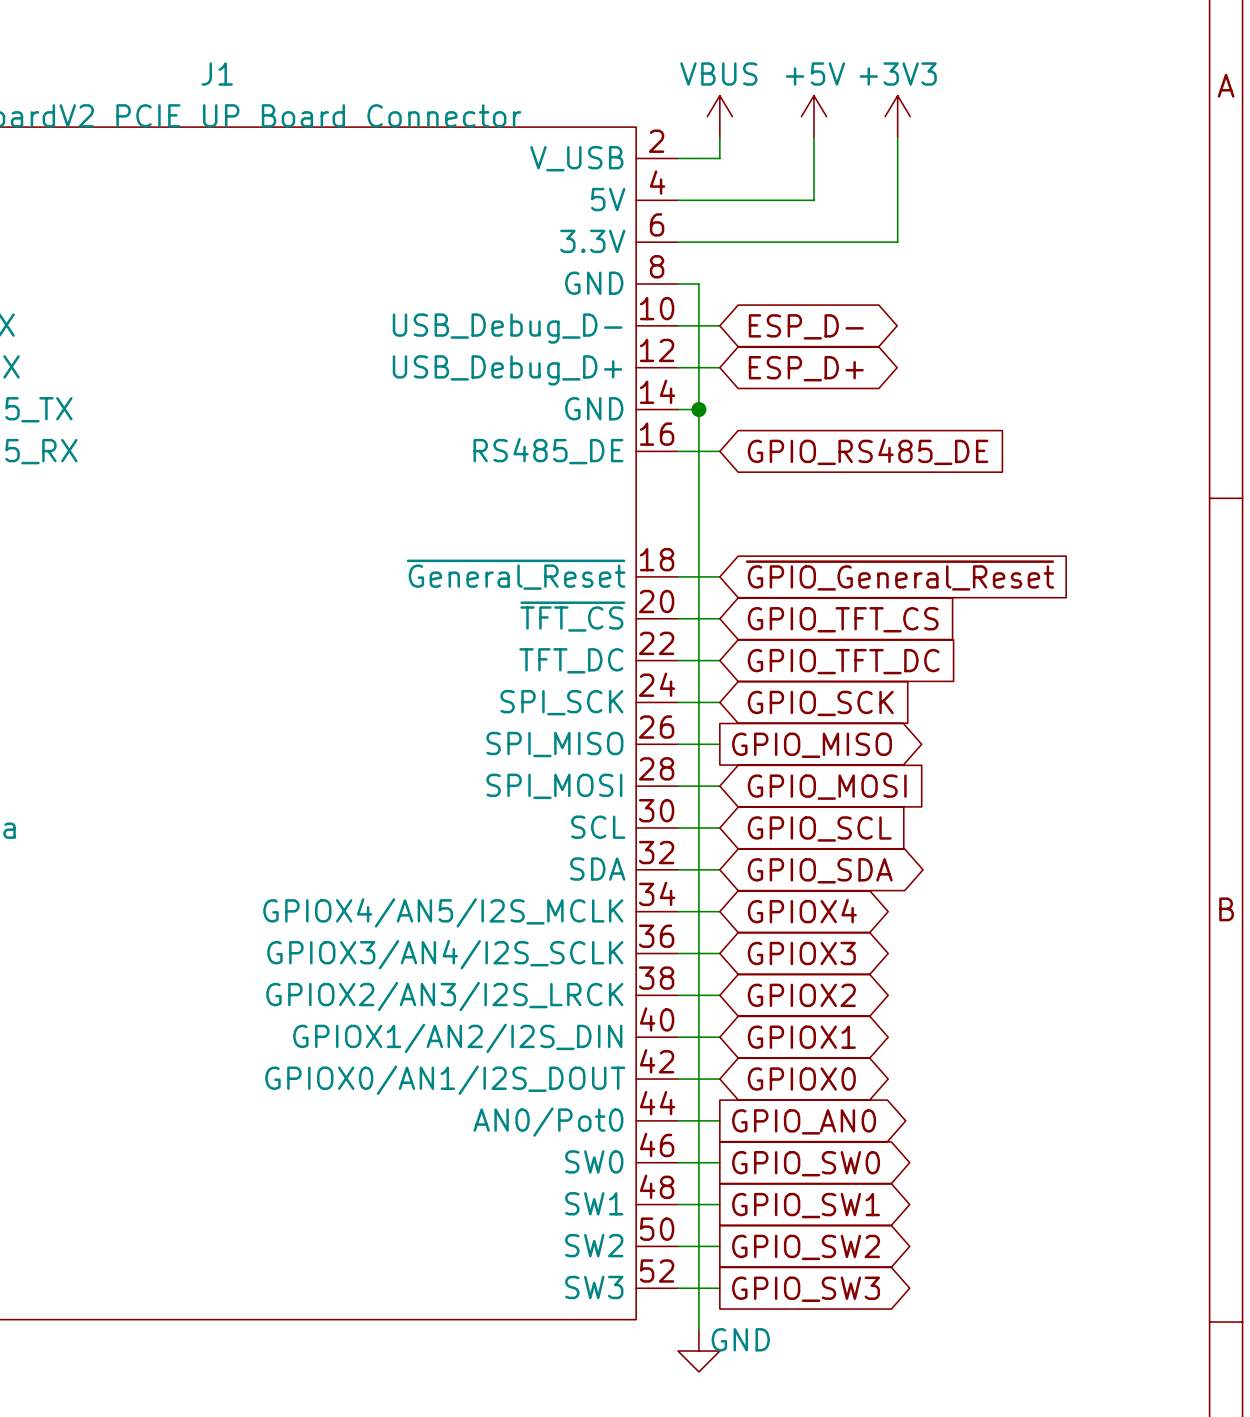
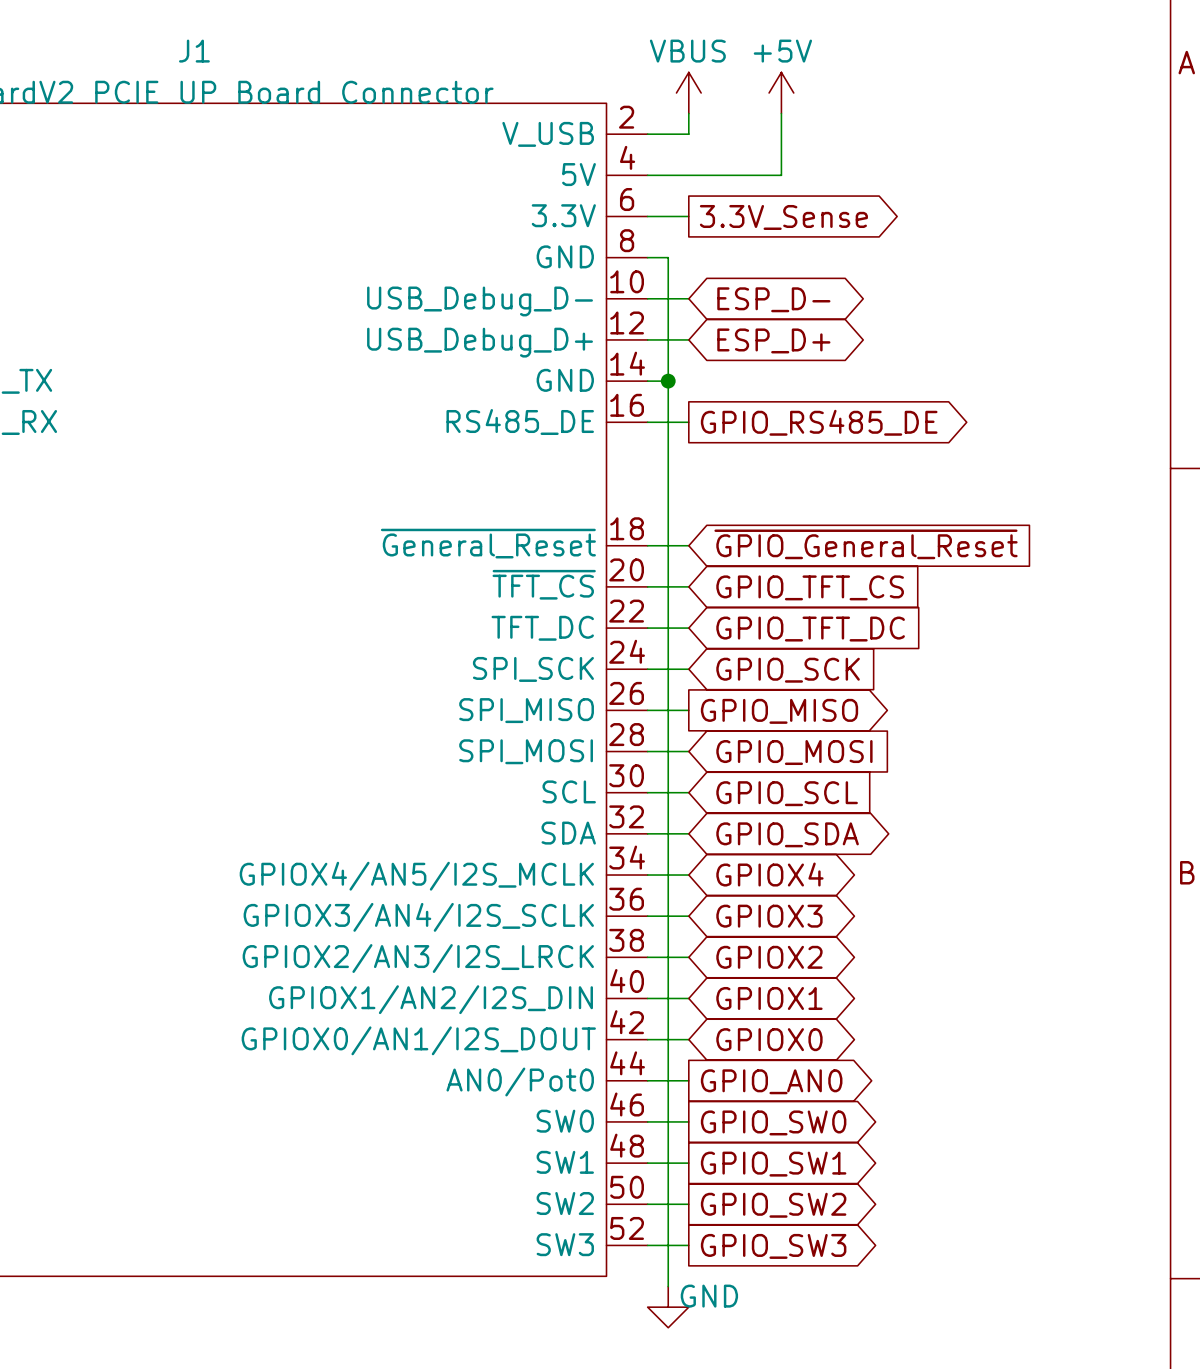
power symbol: +3V3 (897, 116) -> none
wire: (897, 137) (897, 242) (719, 242) -> none
global label: none -> 3.3V_Sense (783, 217)
global label shape: input (868, 451) -> output (819, 422)

